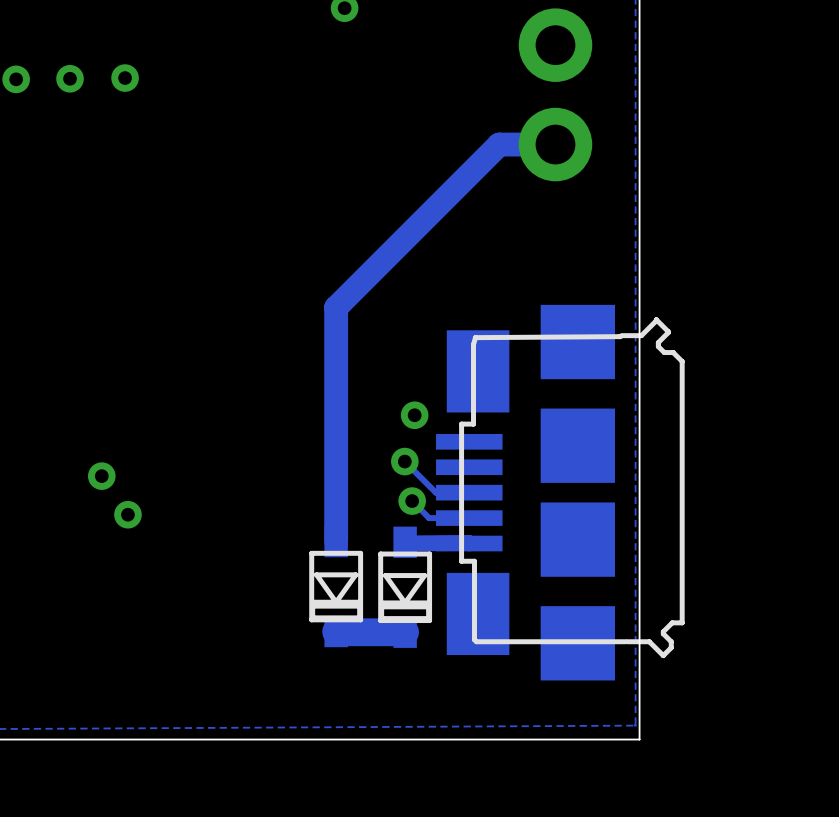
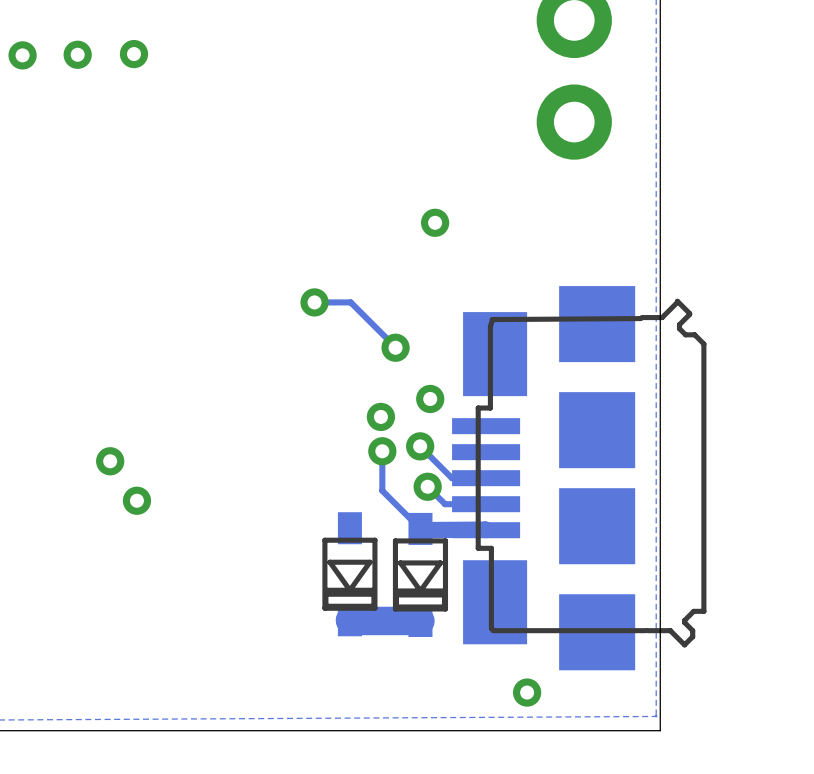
track: (555, 144) (499, 144) (336, 307) (336, 541) -> none
via: none -> (435, 222)
track: none -> (314, 302) (350, 302) (395, 347)
via: none -> (314, 302)
via: none -> (395, 347)
via: none -> (380, 416)
track: none -> (382, 451) (382, 490) (420, 528)
via: none -> (382, 451)
via: none -> (527, 692)

